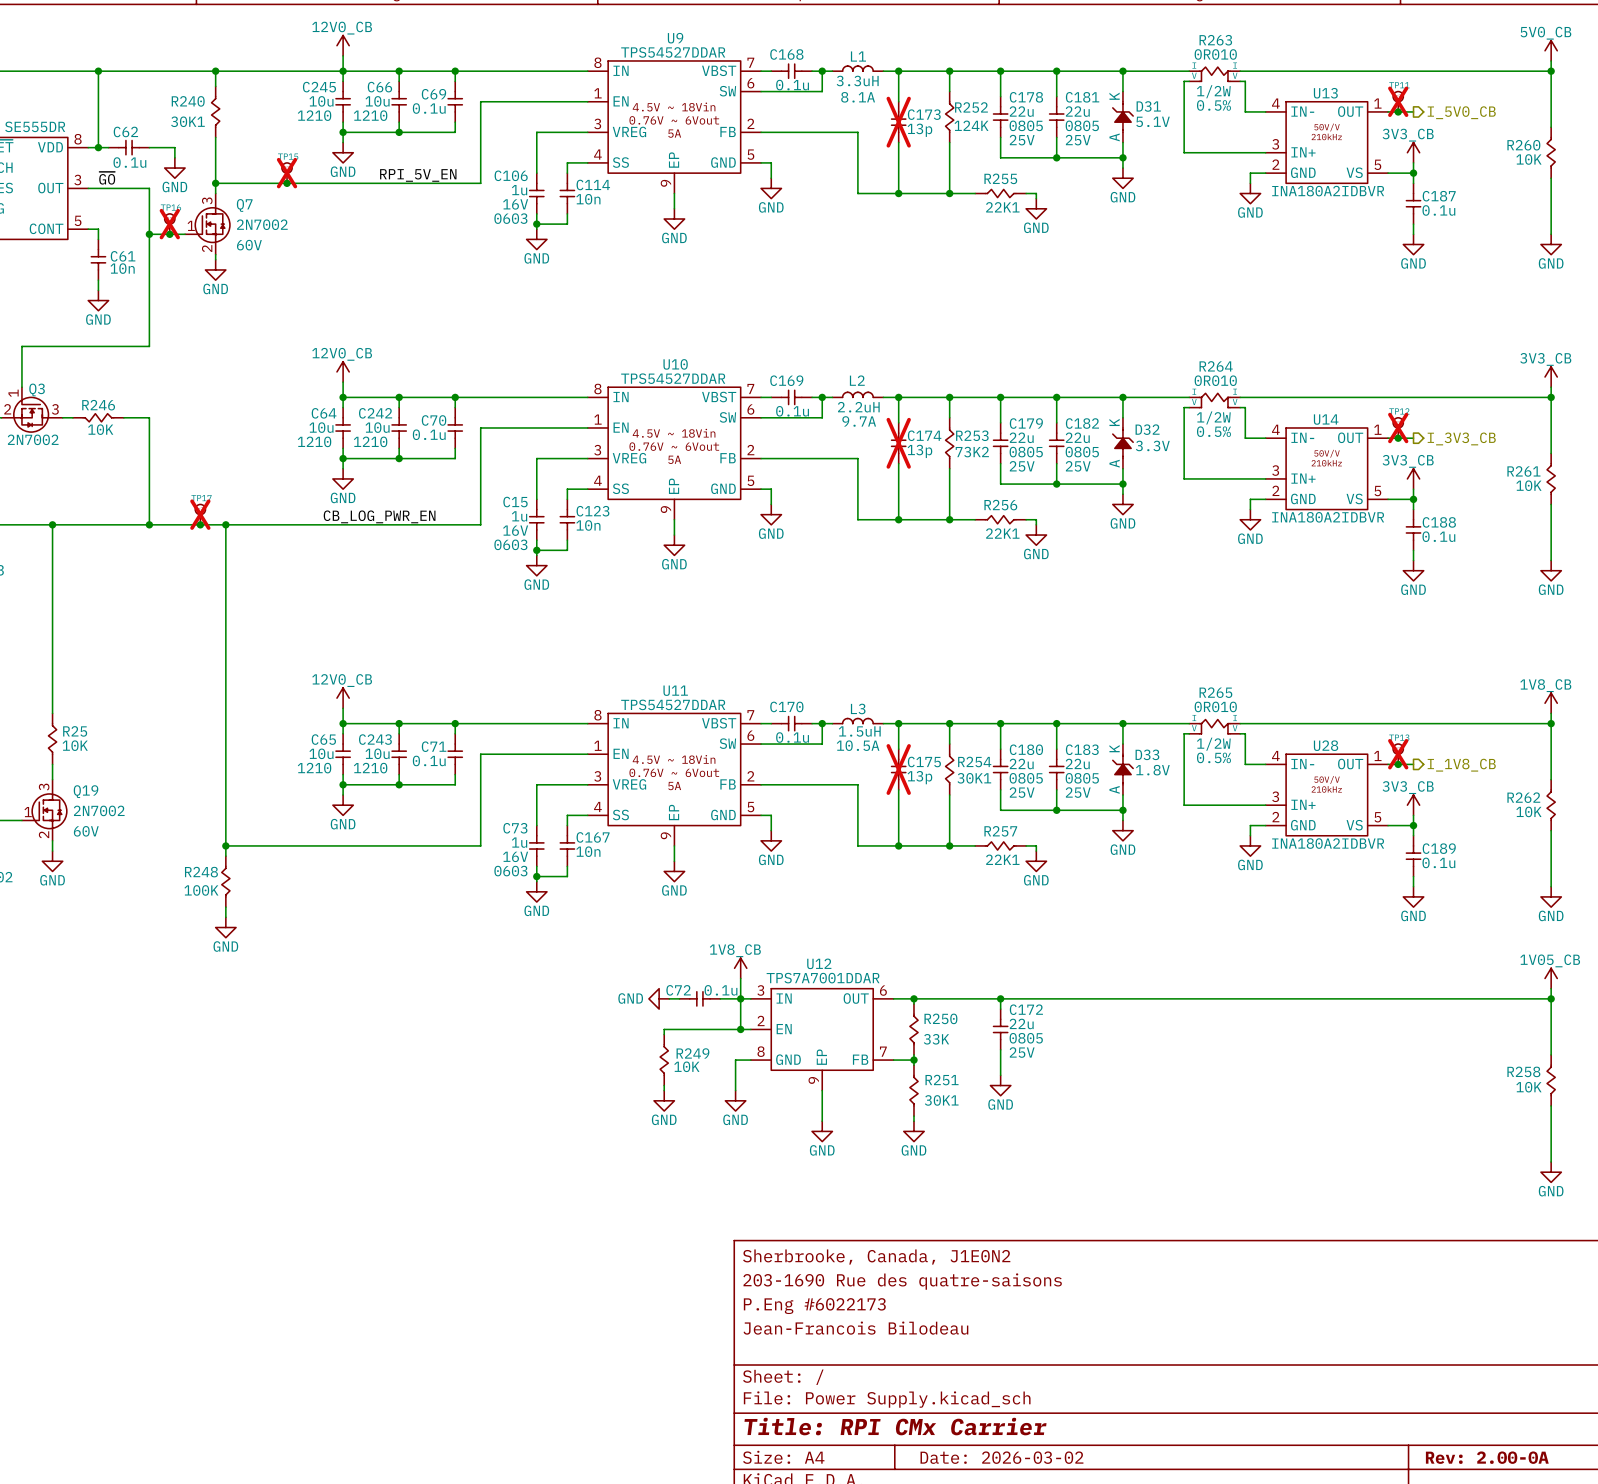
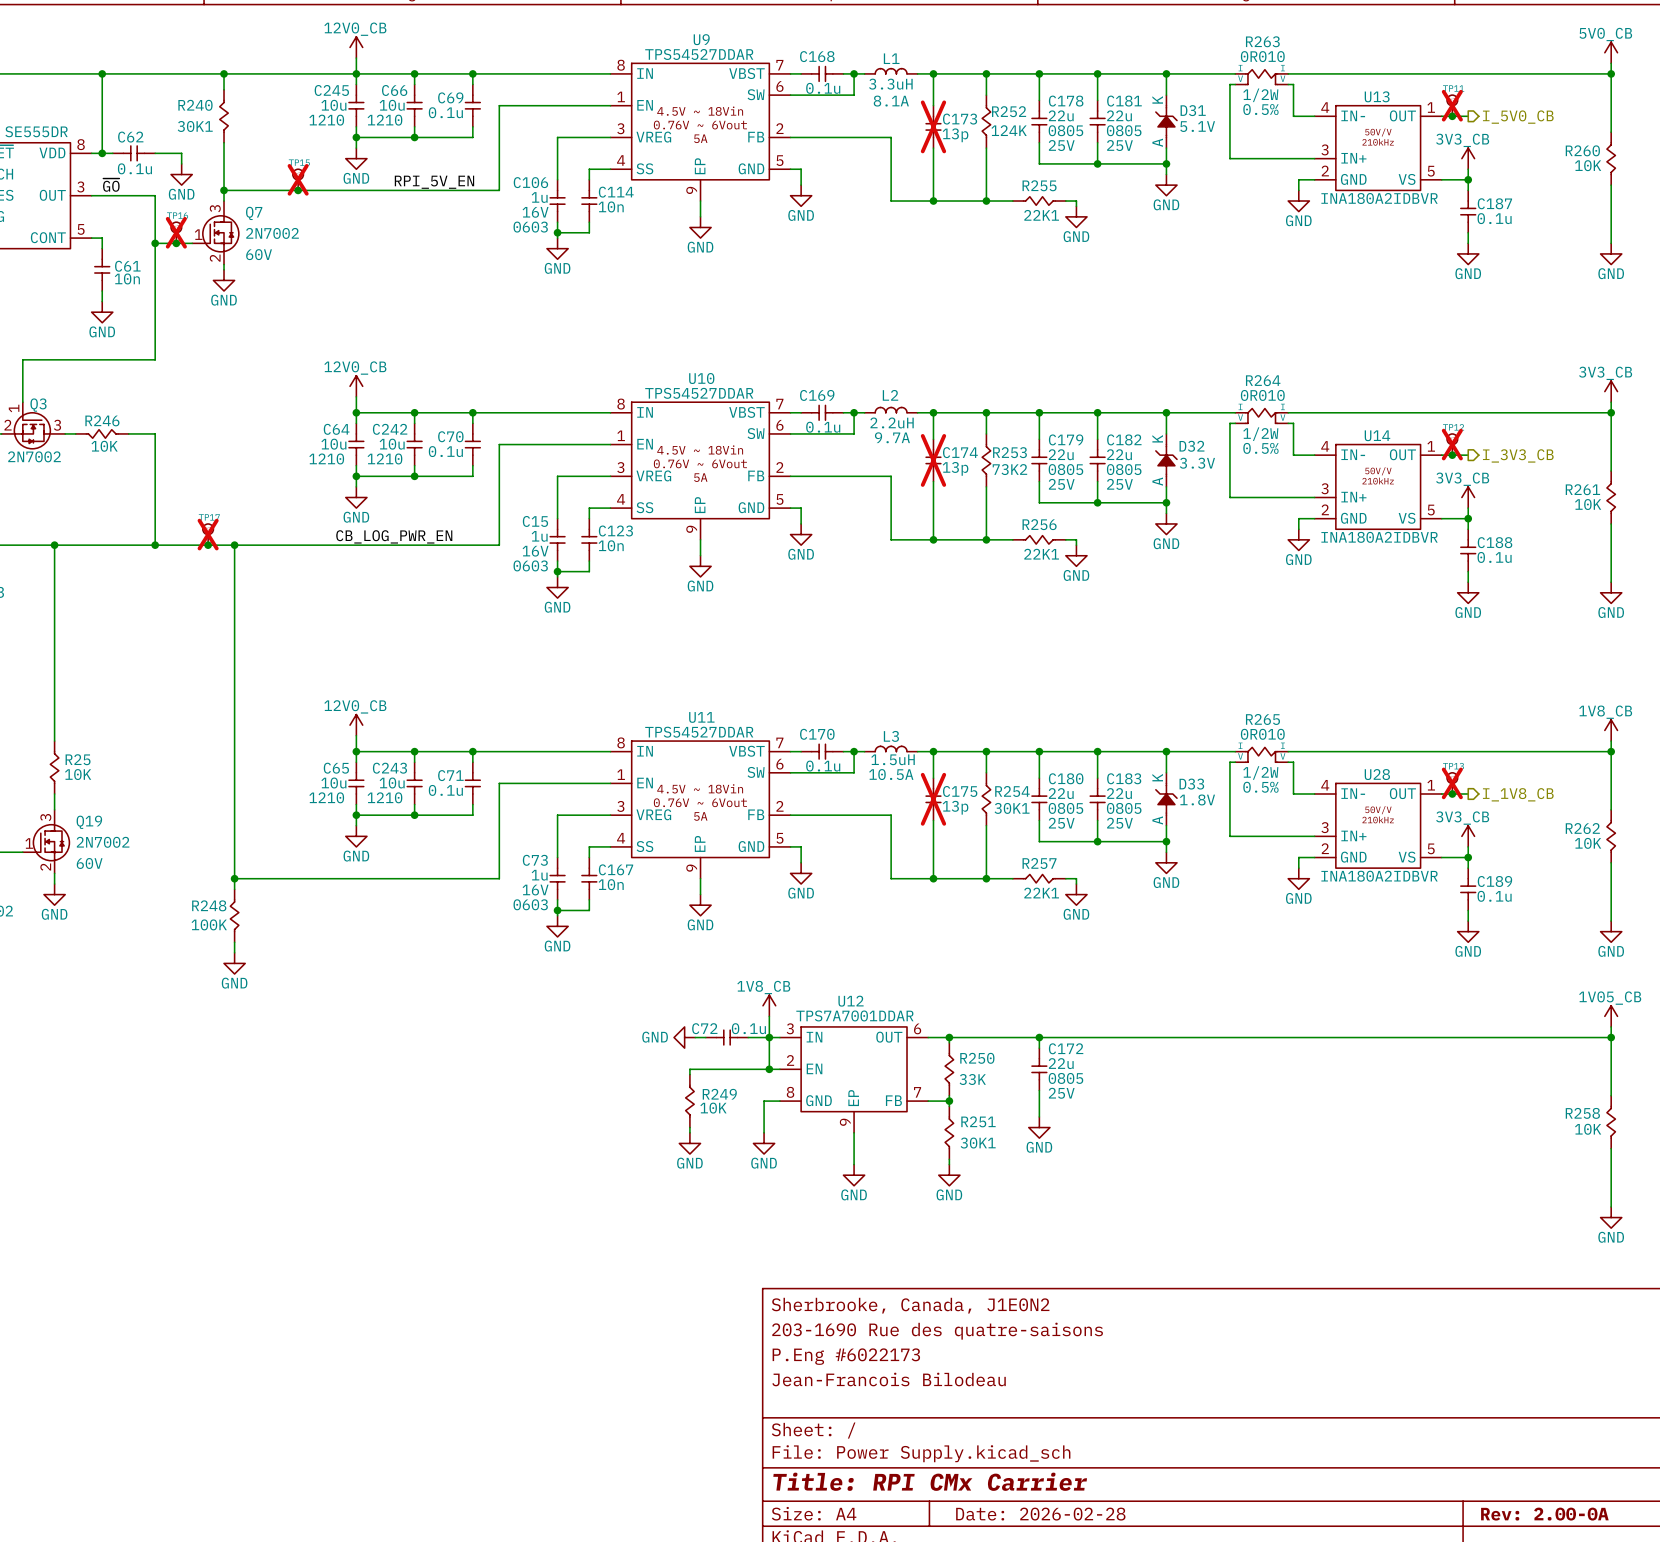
title block: Date: 2026-03-02 (1001, 1457) -> Date: 2026-02-28 (1040, 1514)

